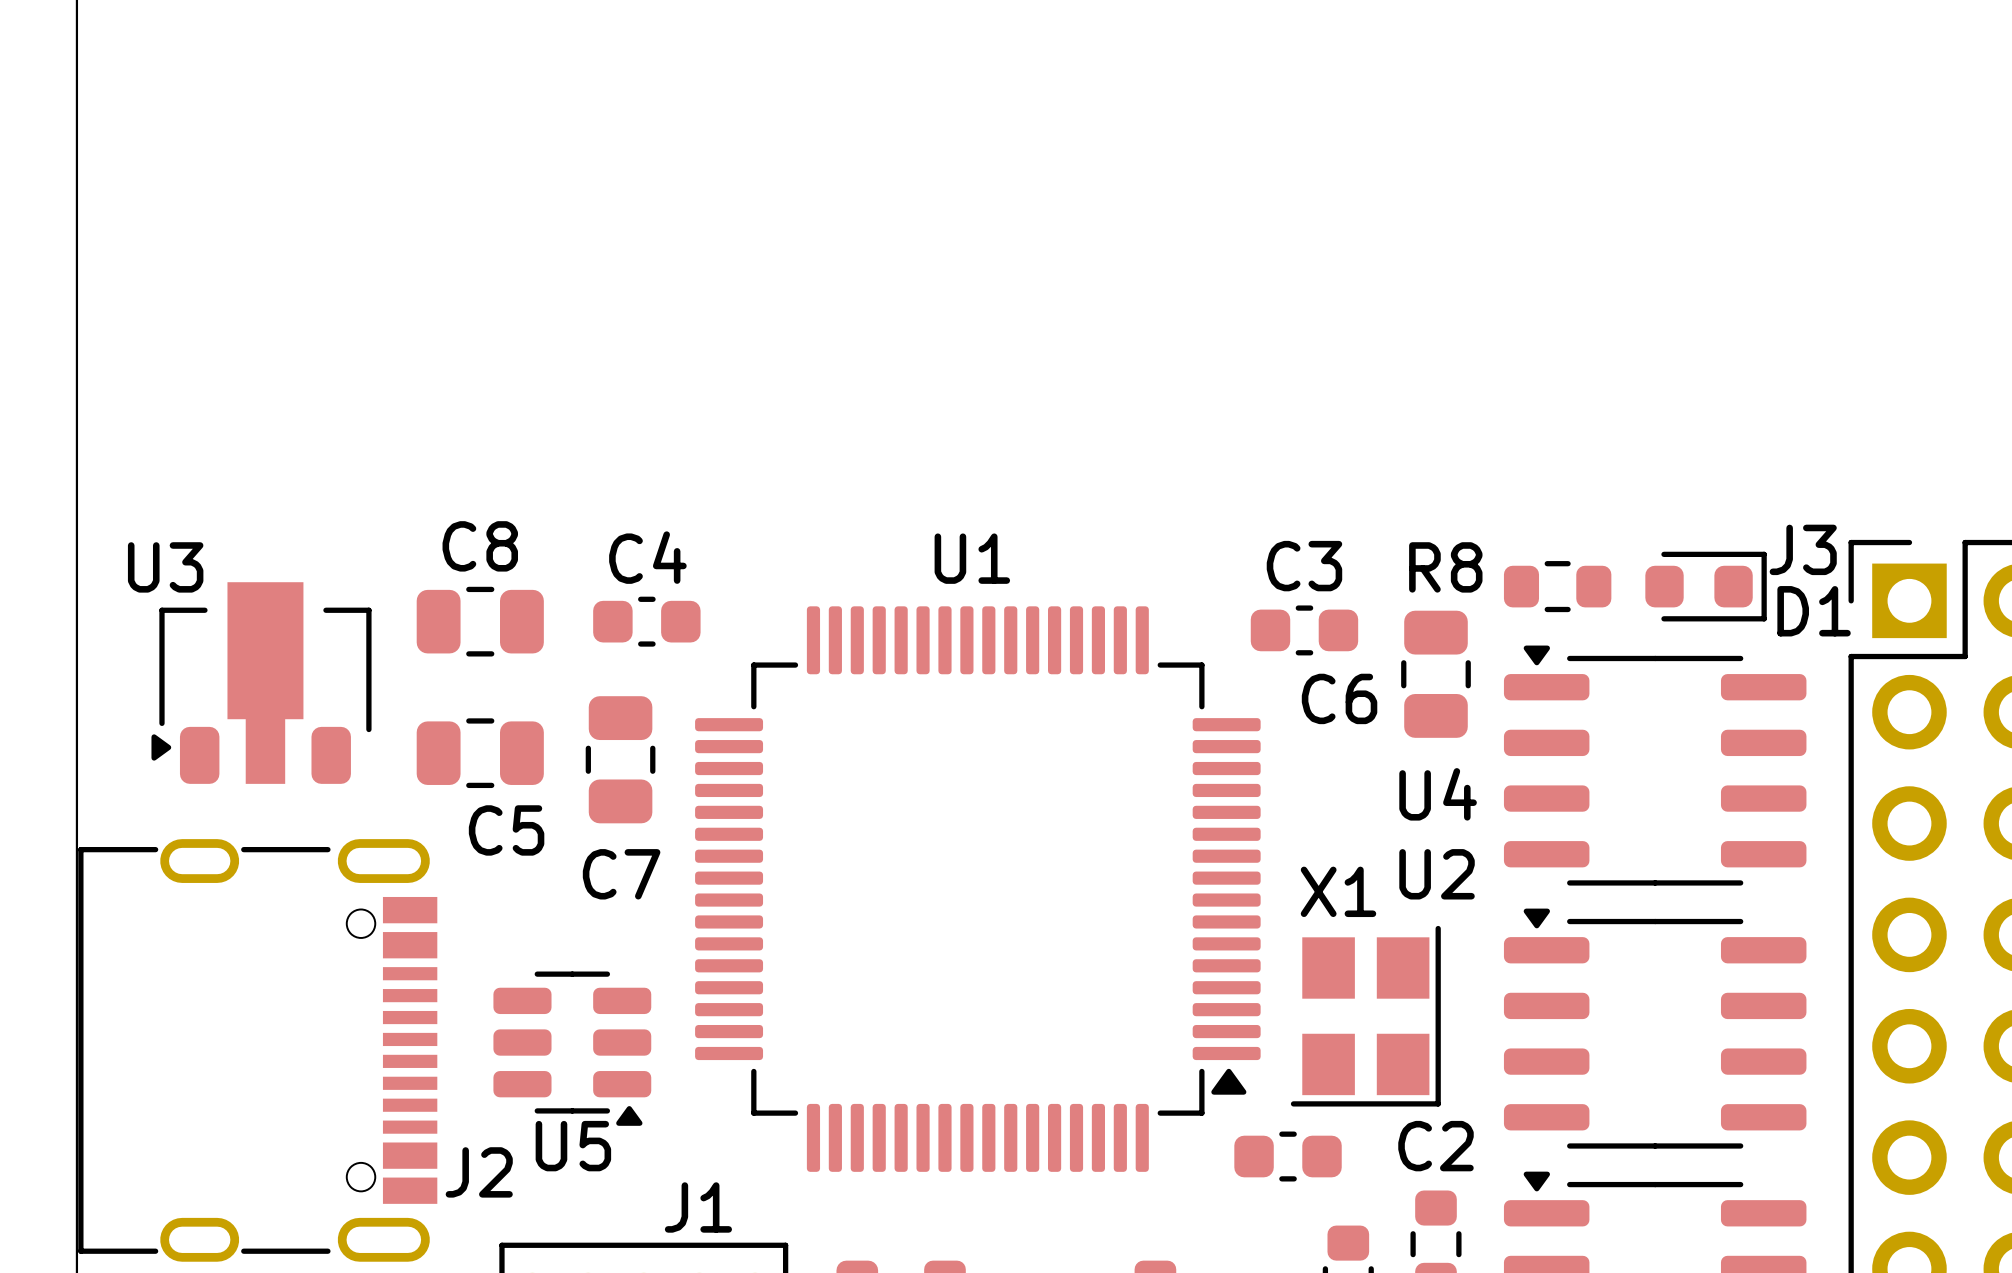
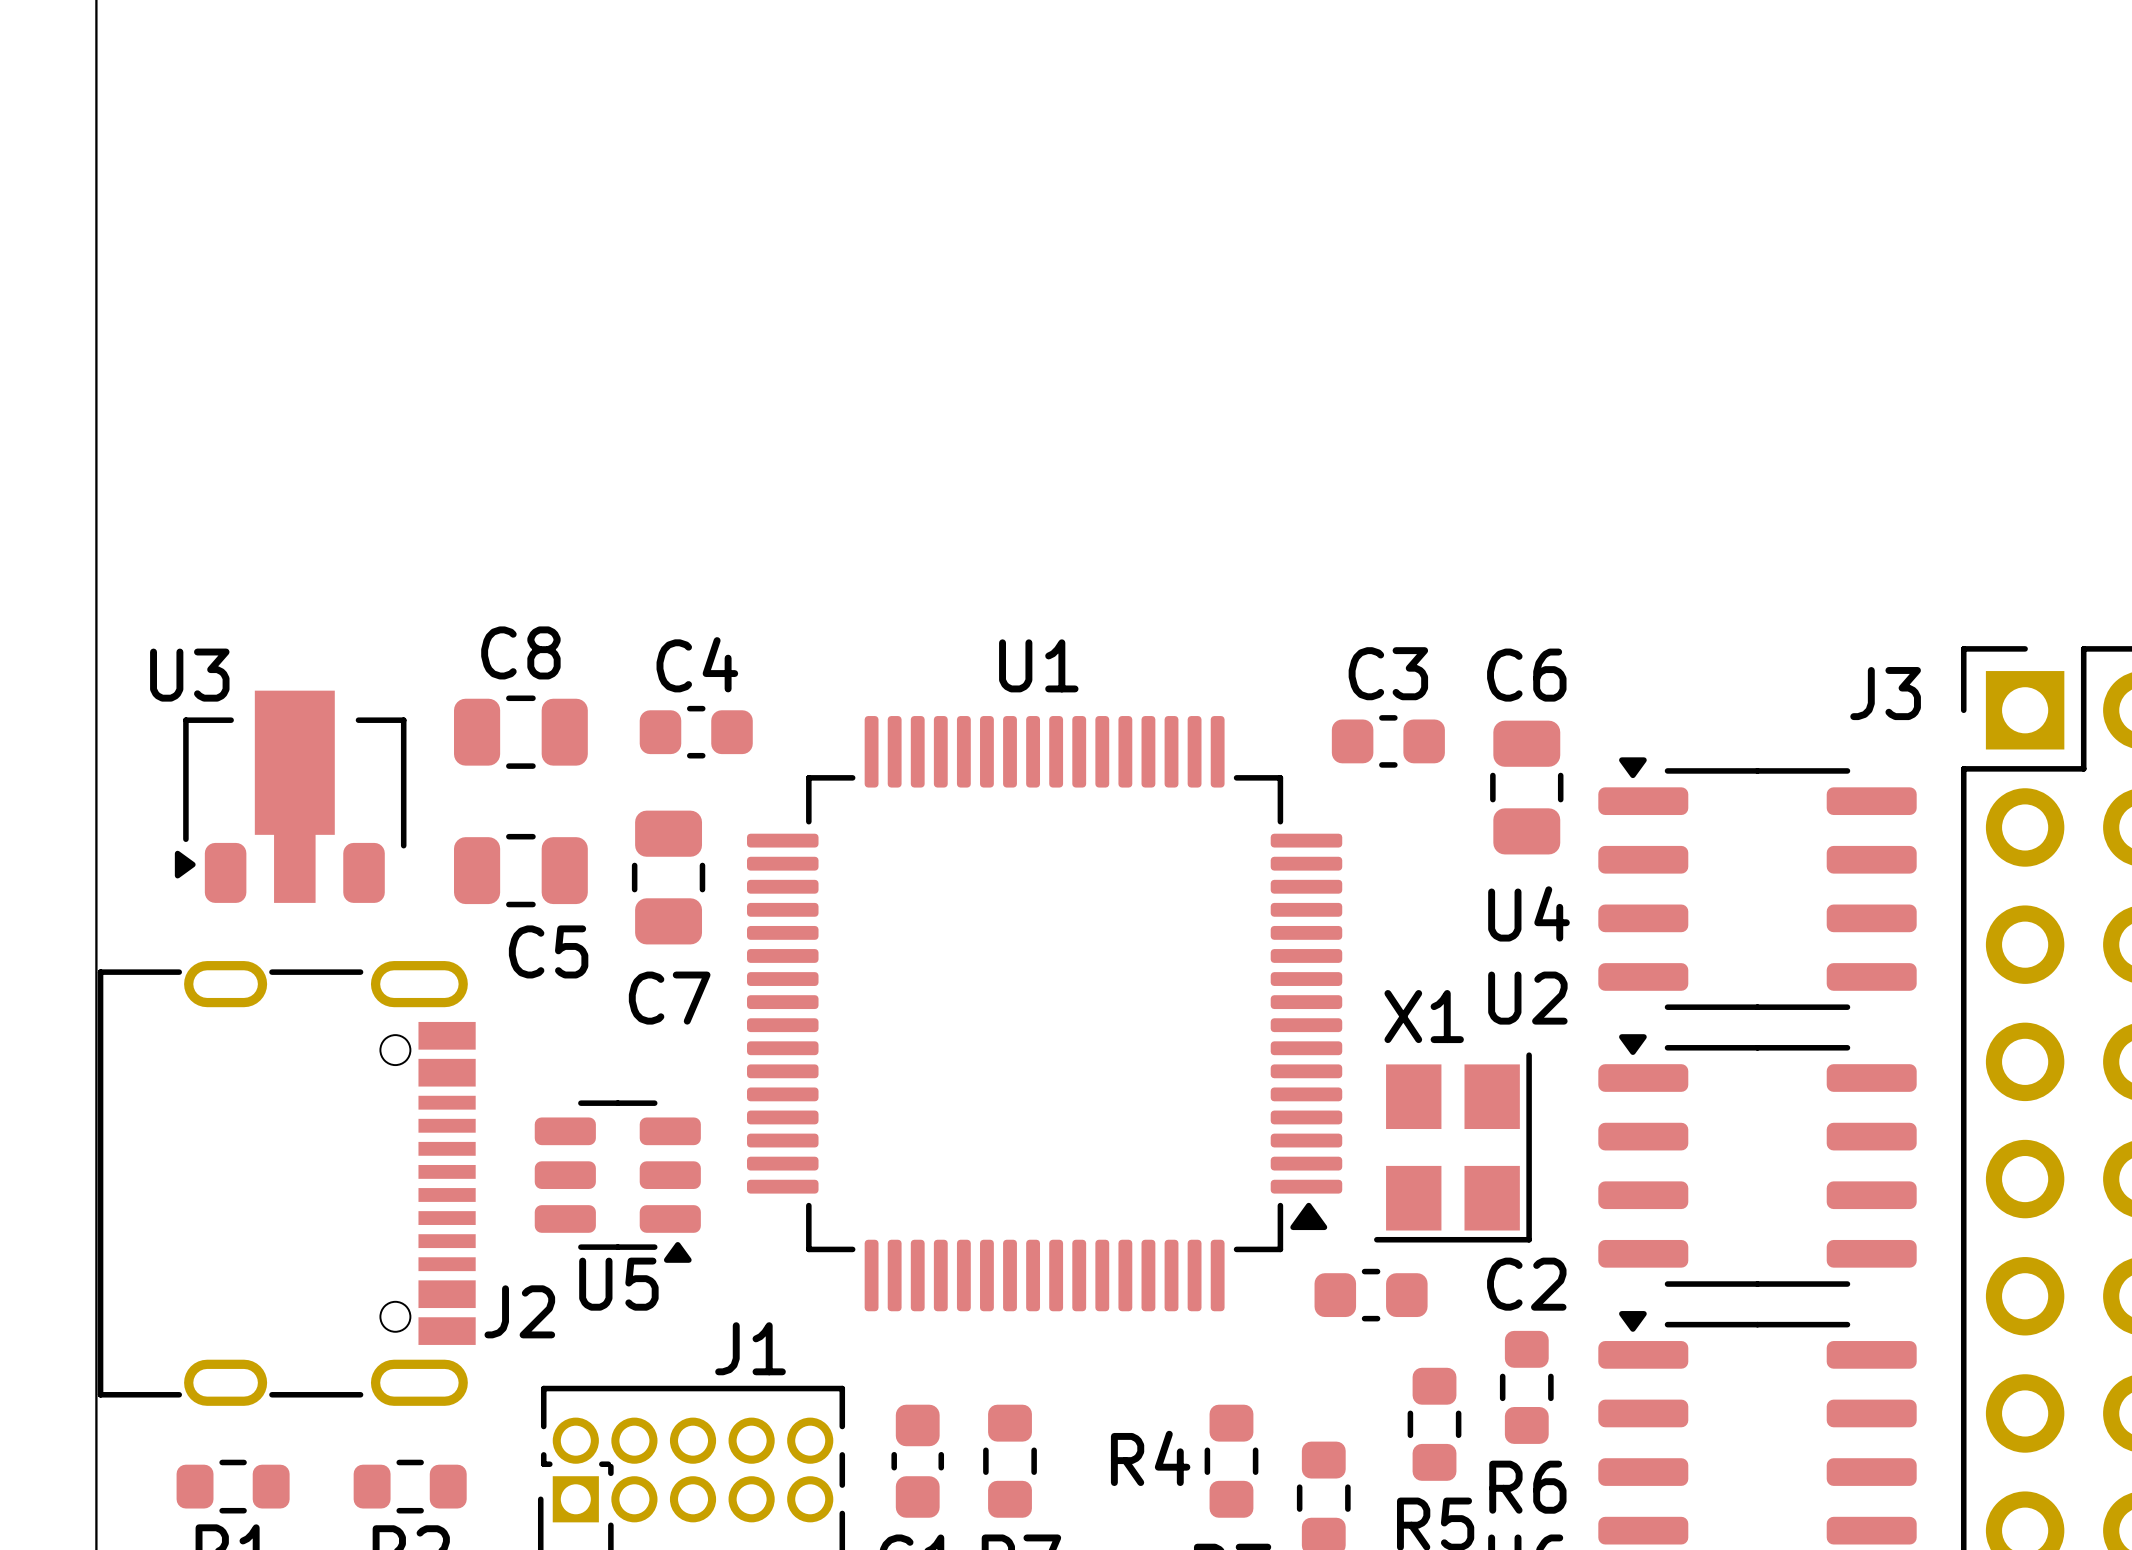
J3 name position: J3 (1803, 549) -> J3 (1885, 693)
R8: (1557, 586) -> none
D1: (1706, 586) -> none
C6 name position: C6 (1339, 698) -> C6 (1526, 675)

